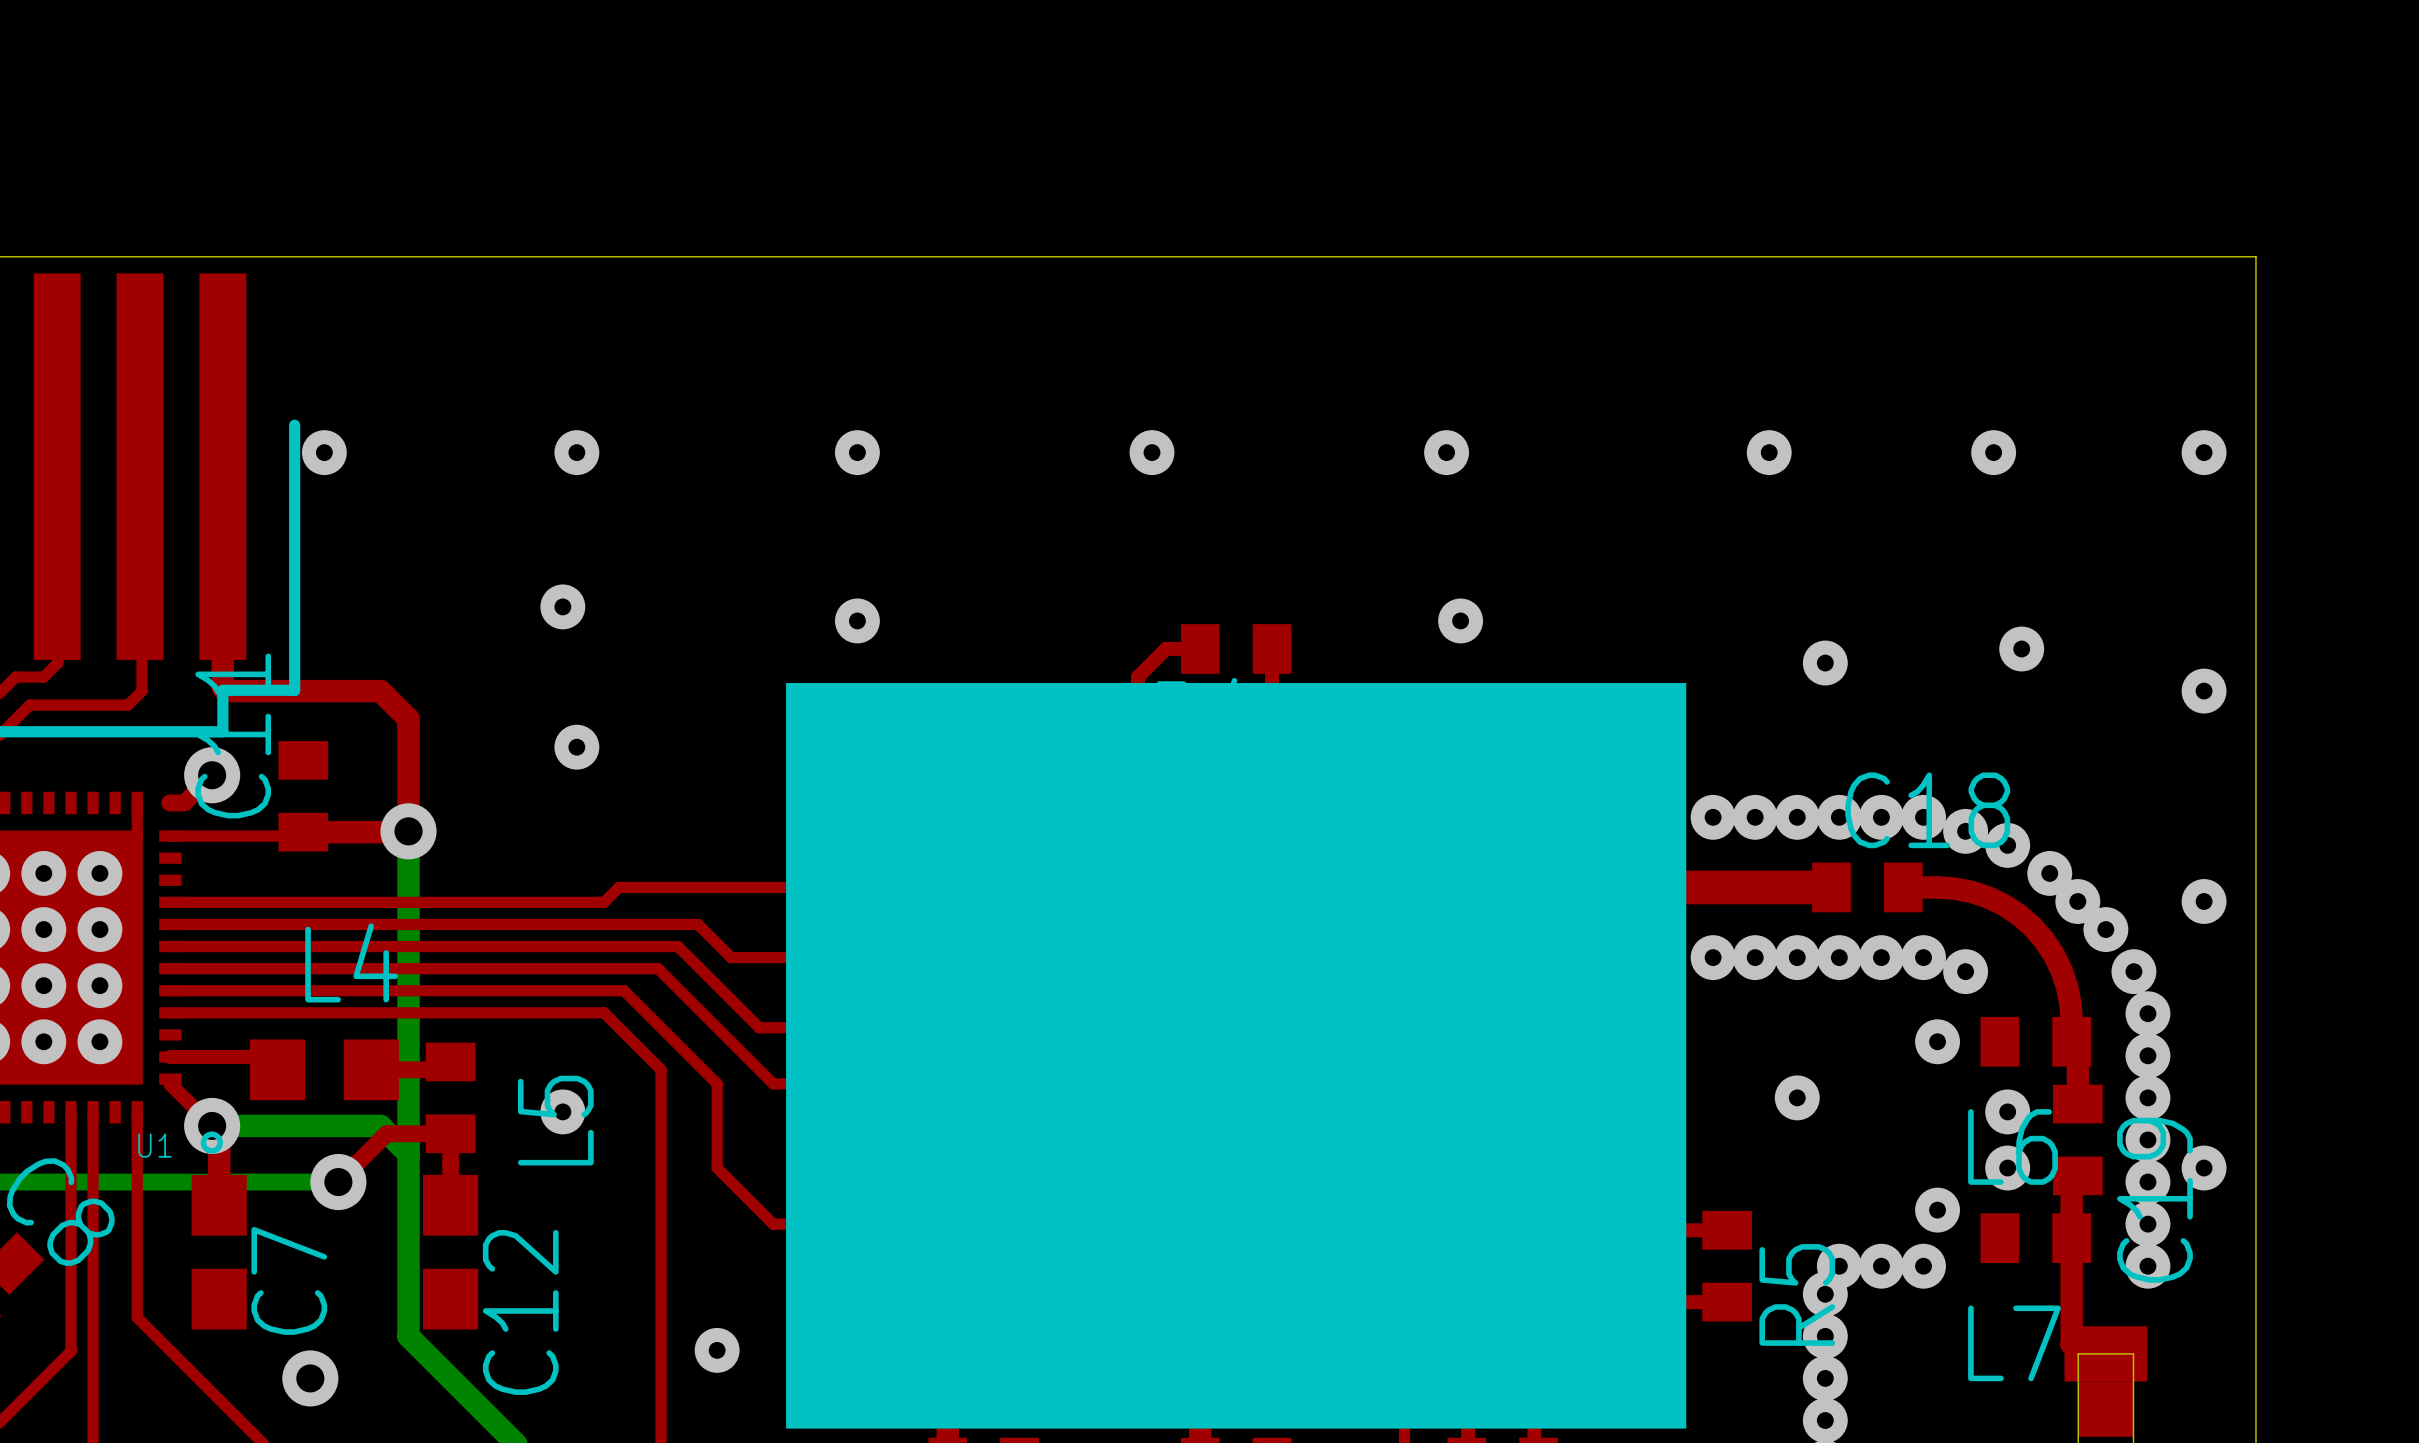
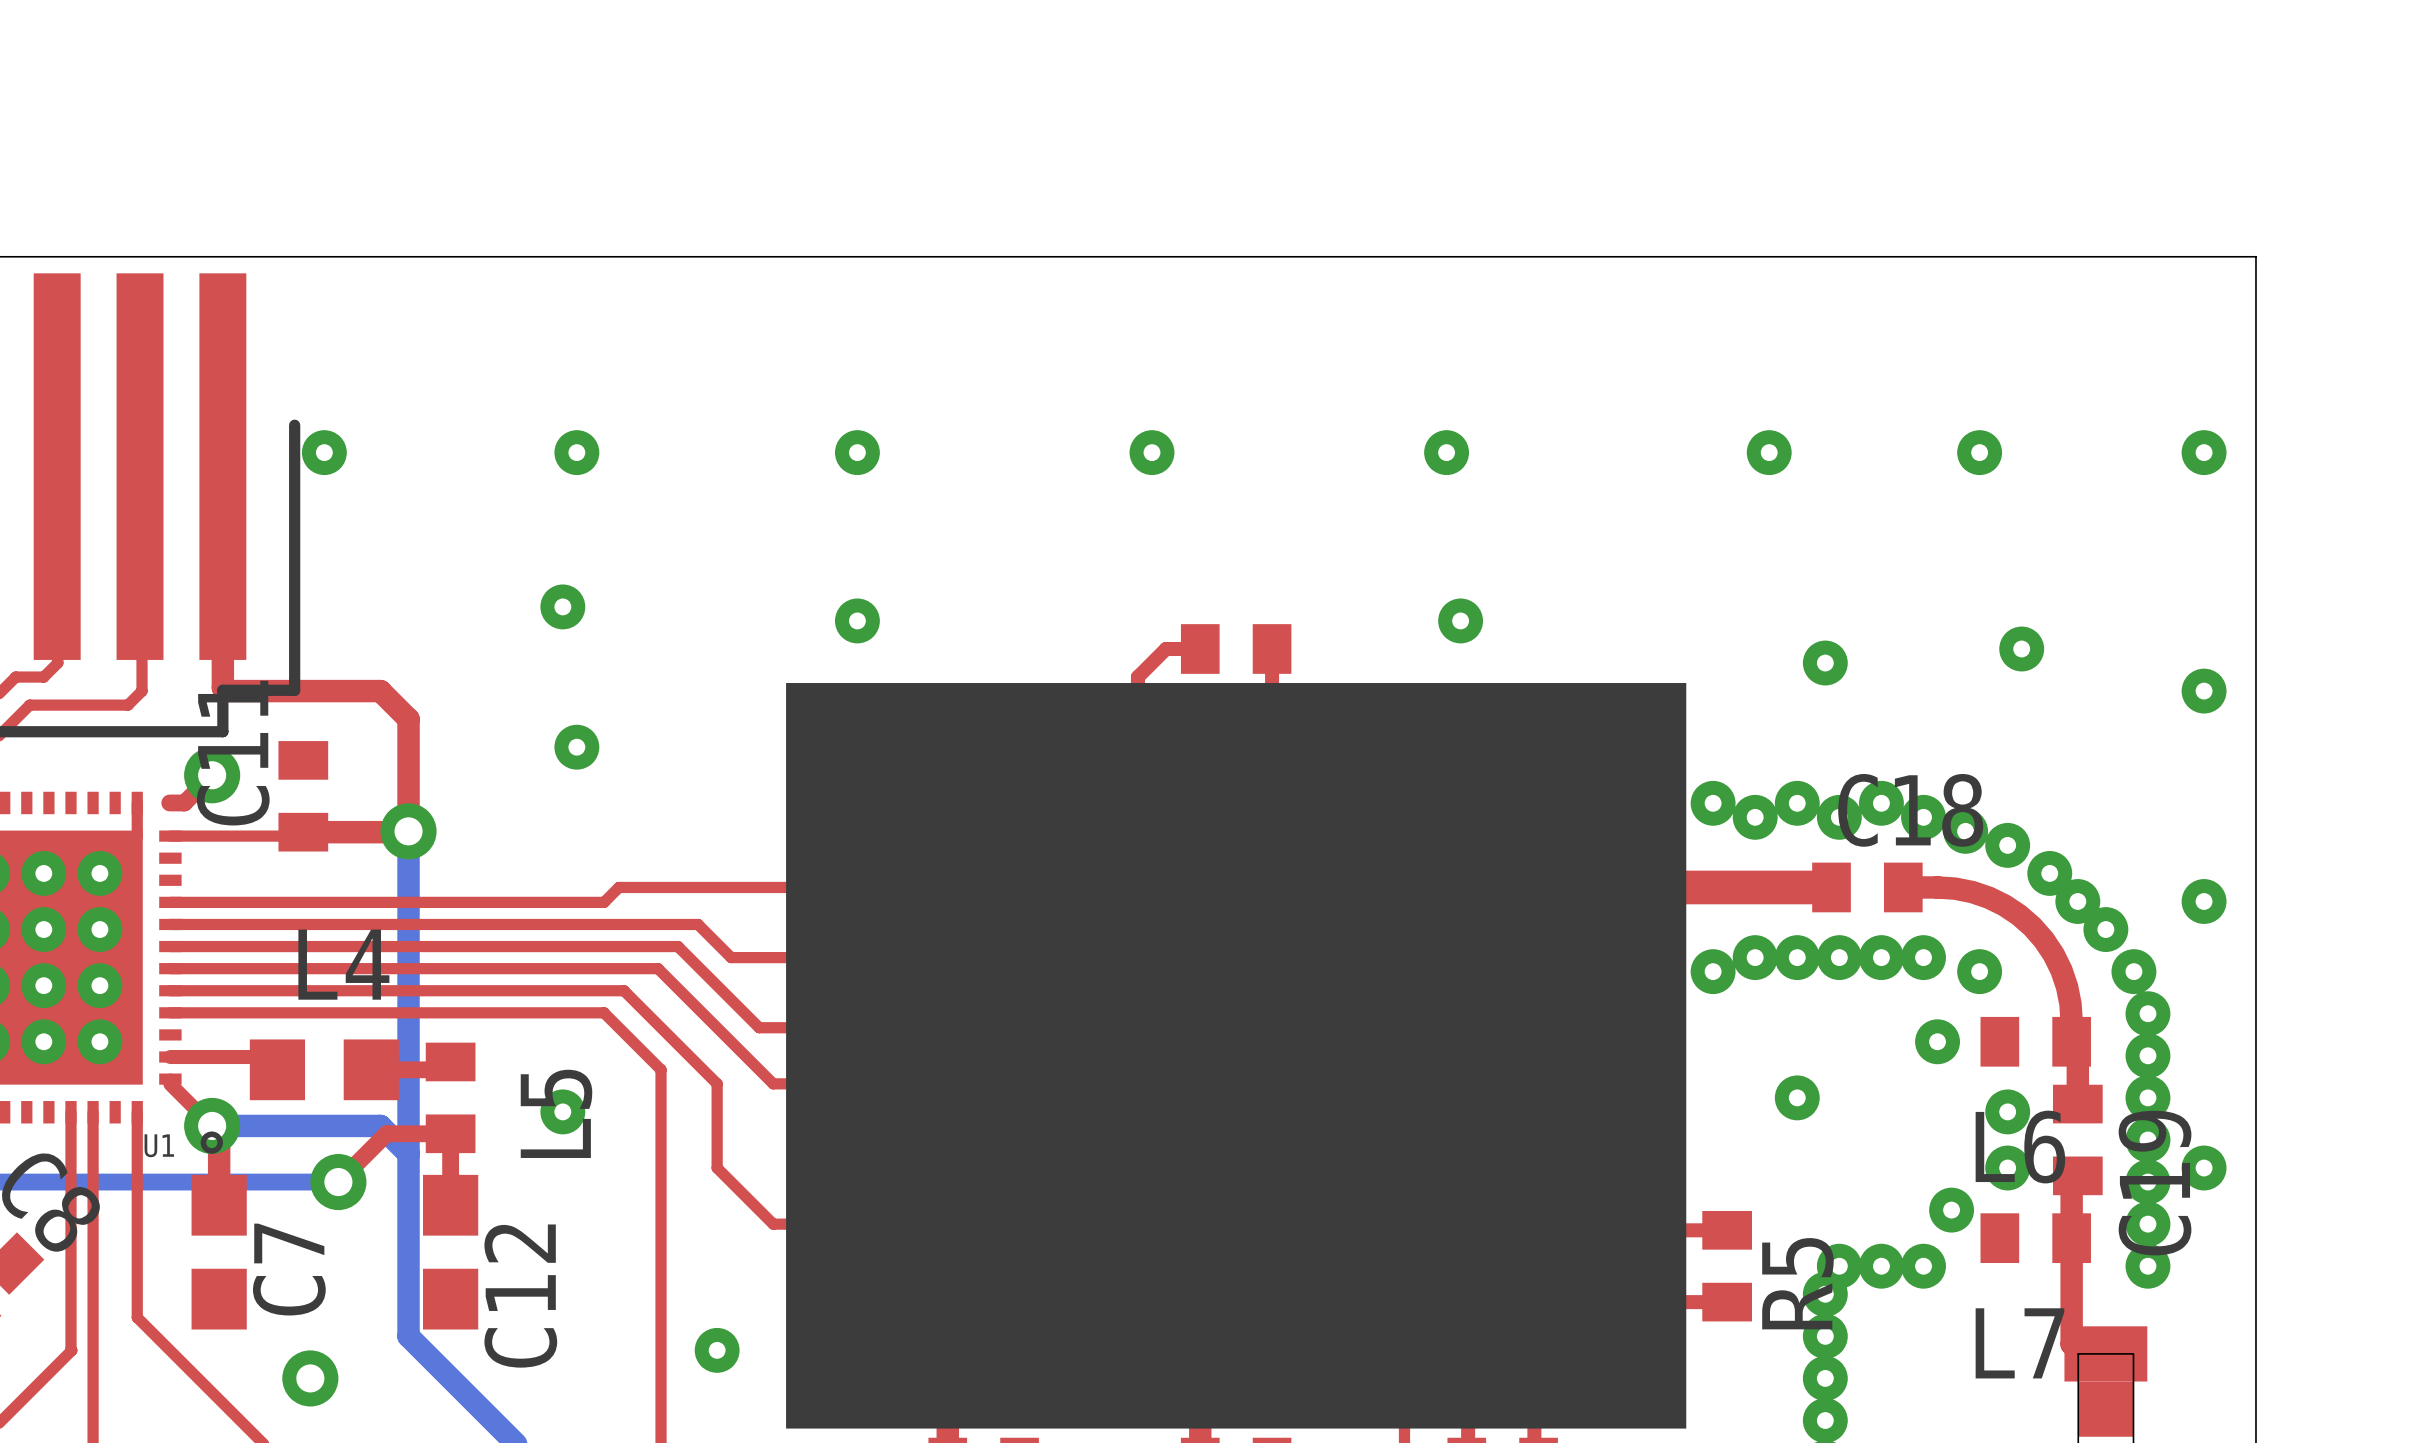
via position: (1993, 452) -> (1979, 452)
via position: (1713, 817) -> (1713, 803)
via position: (1797, 817) -> (1797, 803)
via position: (1881, 817) -> (1881, 803)
via position: (1713, 957) -> (1713, 971)
via position: (1965, 971) -> (1979, 971)
via position: (1937, 1210) -> (1951, 1210)

